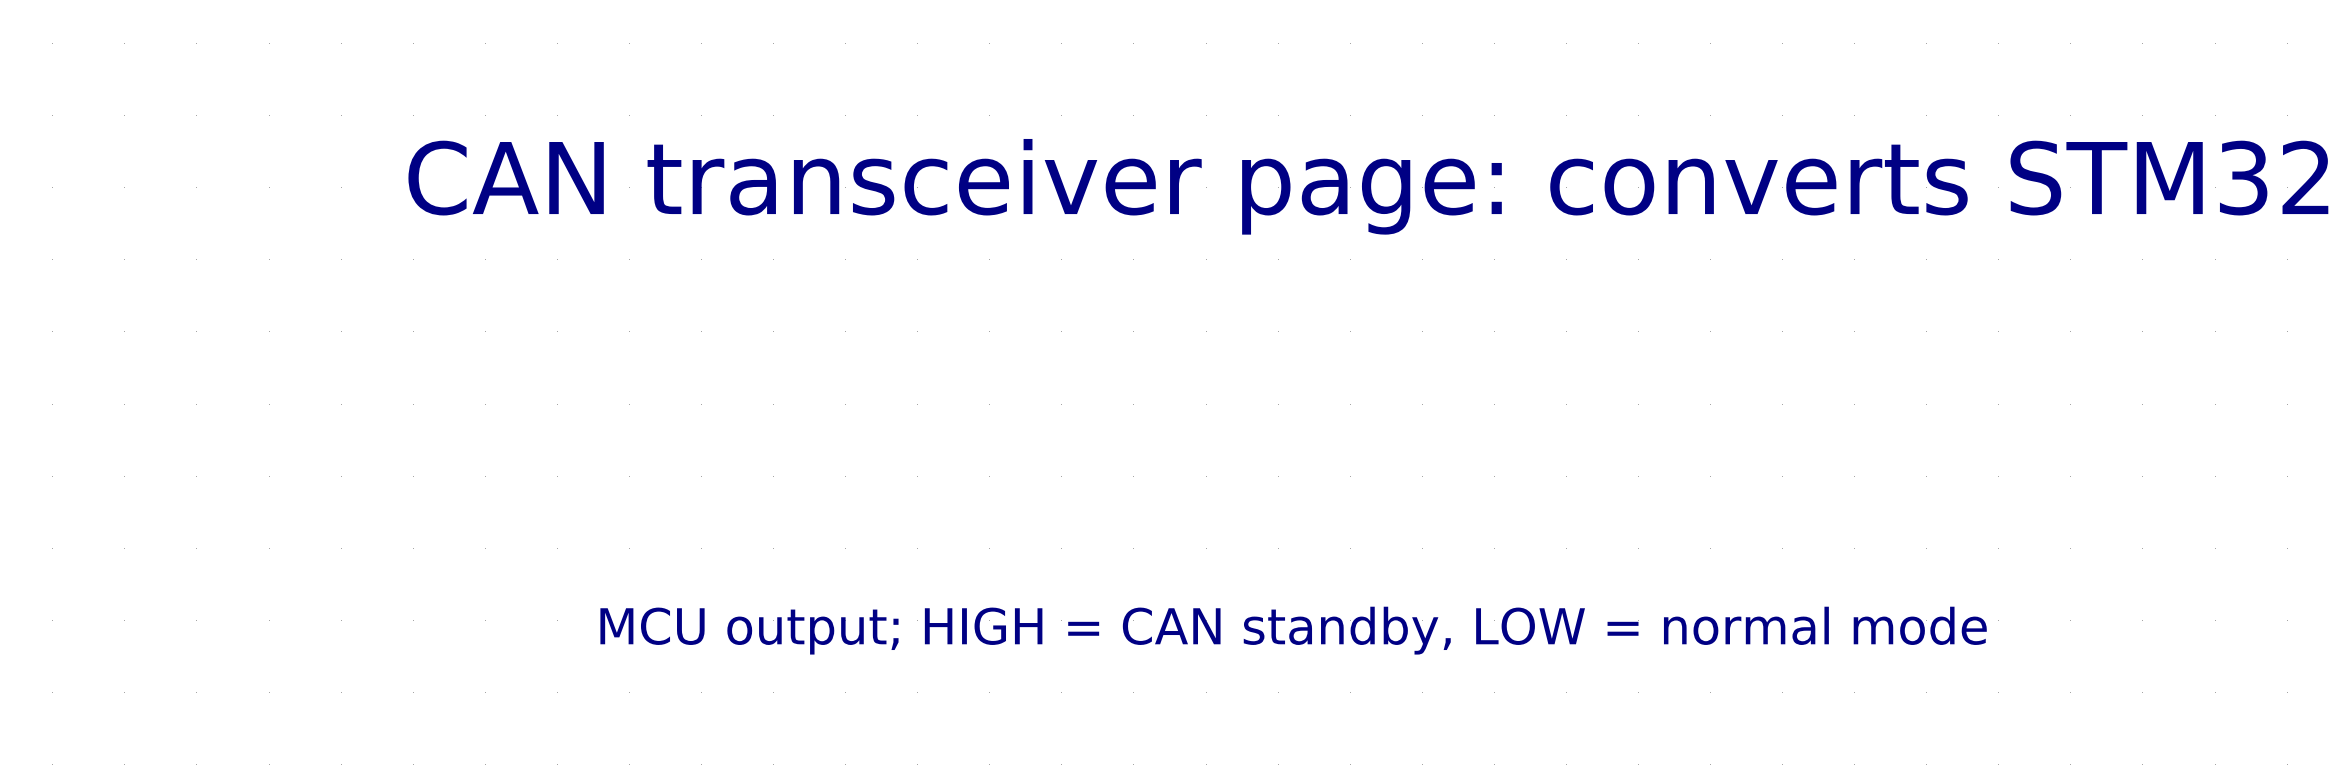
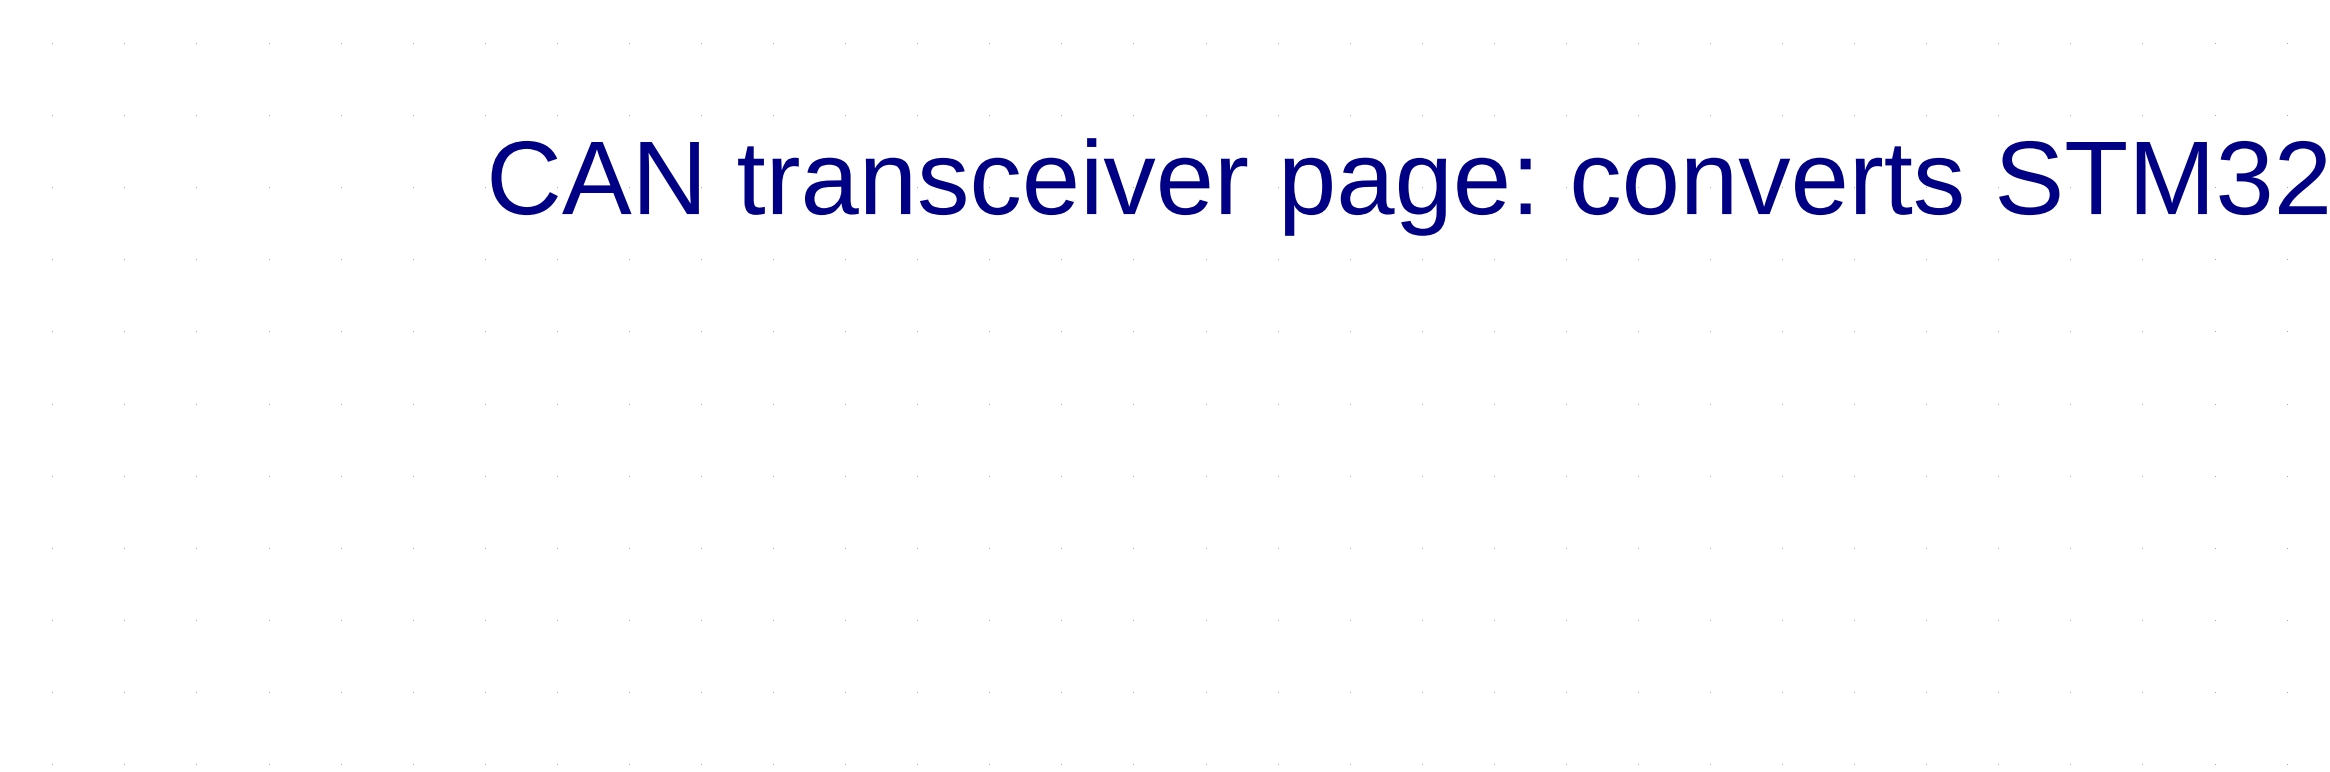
text: MCU output; HIGH = CAN standby, LOW = normal mode (1293, 630) -> none

